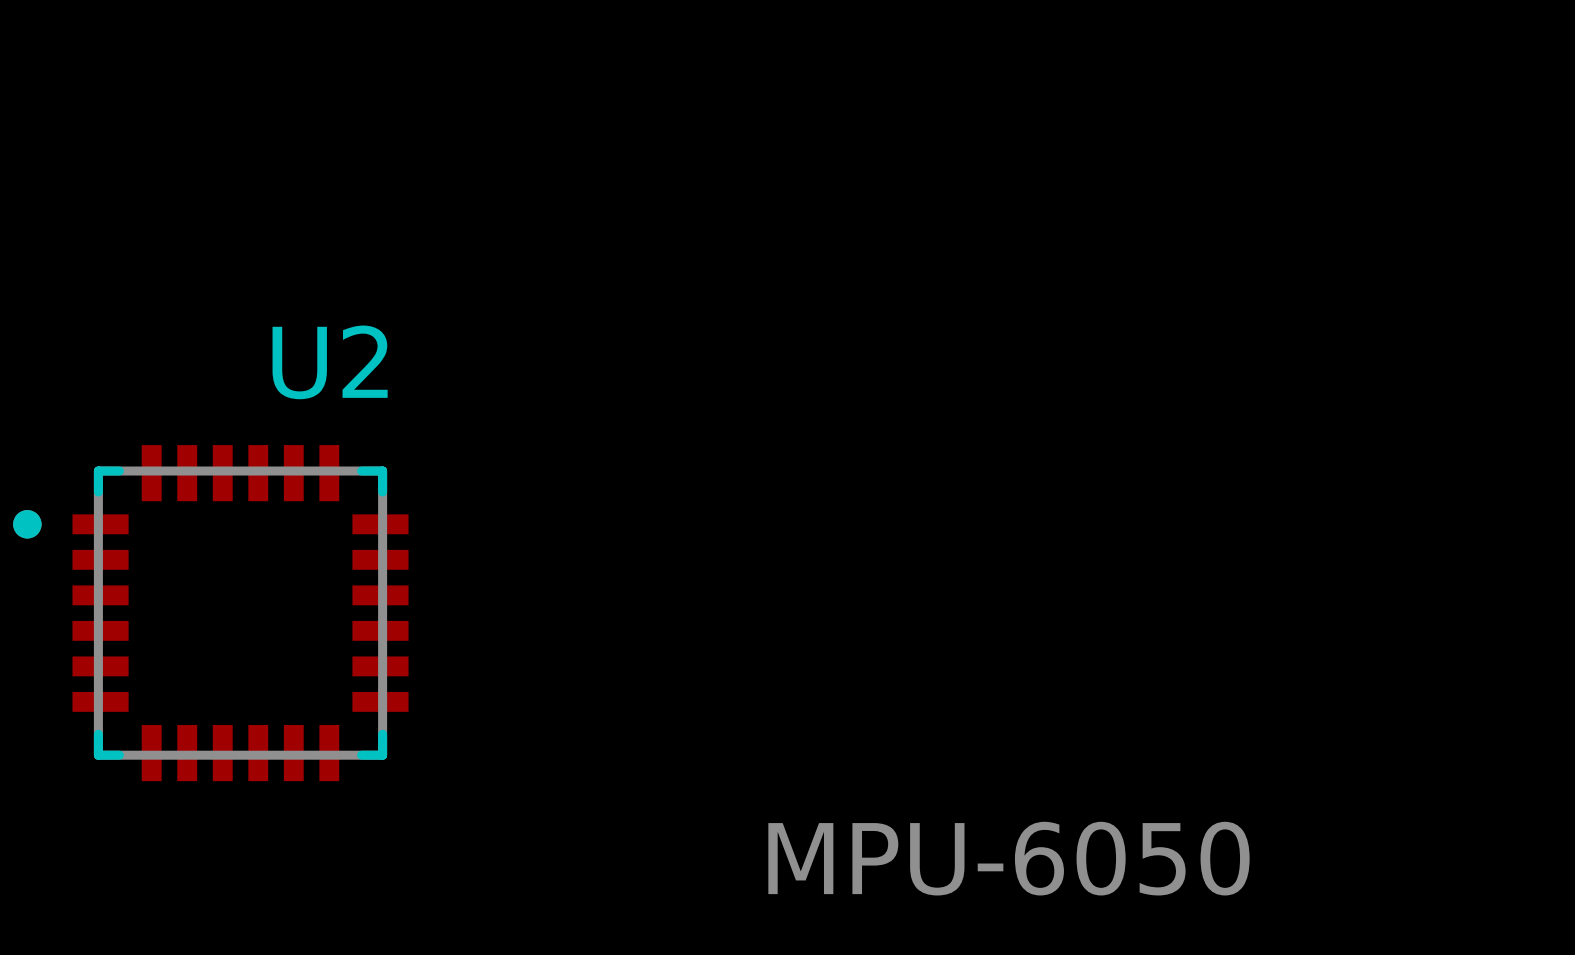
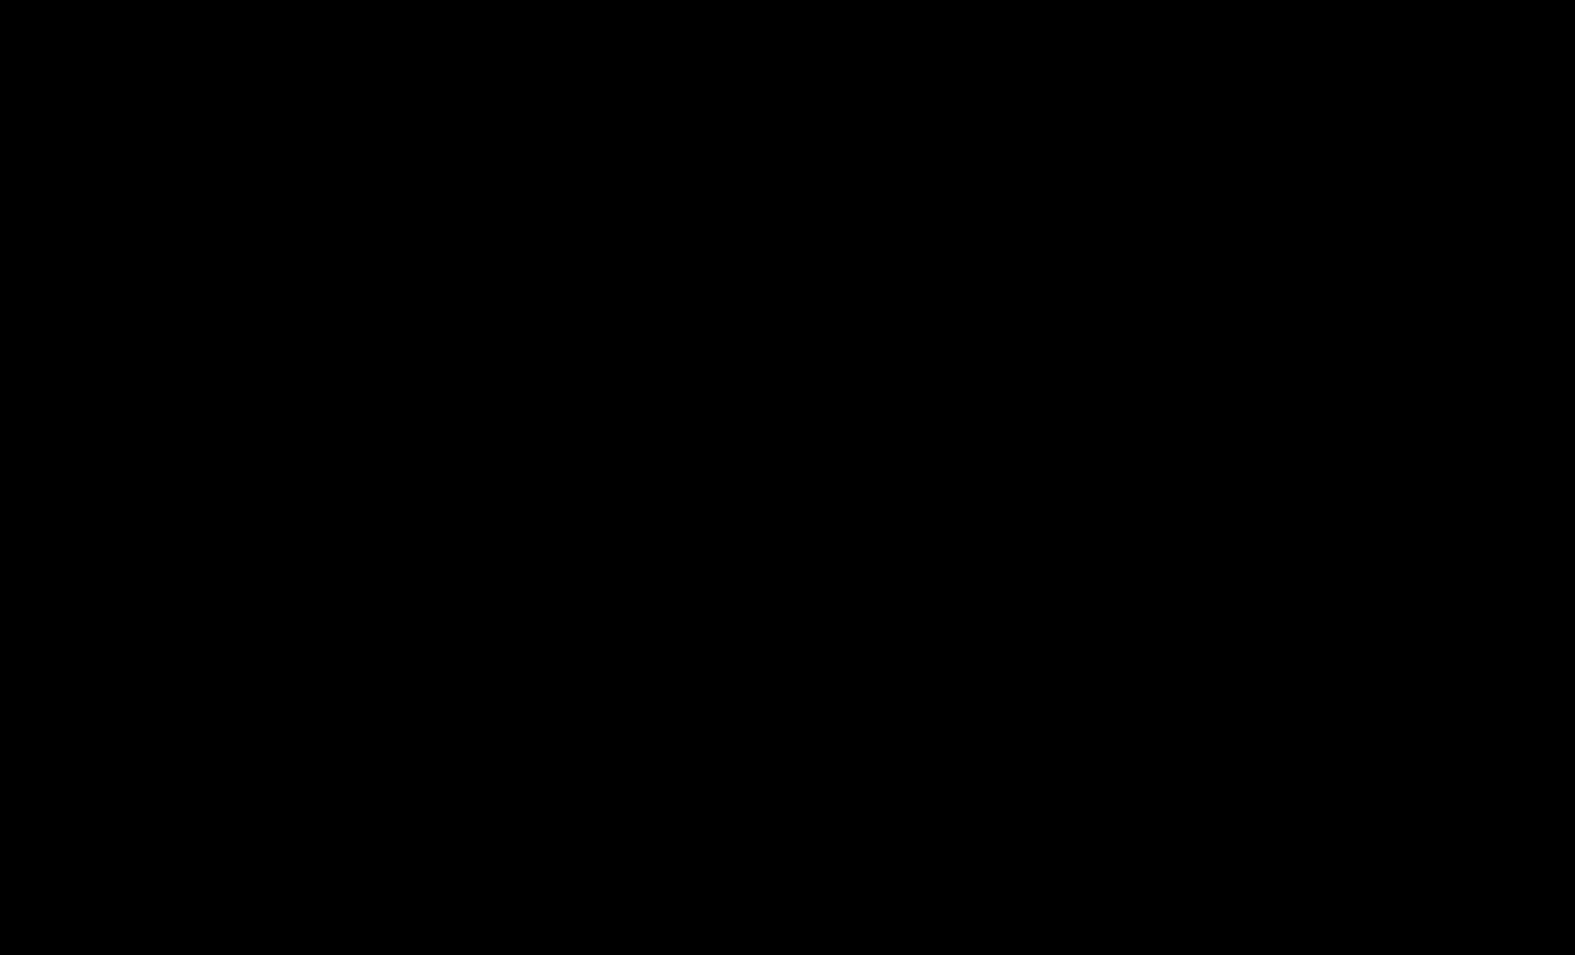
U2: MPU-6050 (210, 613) -> none

